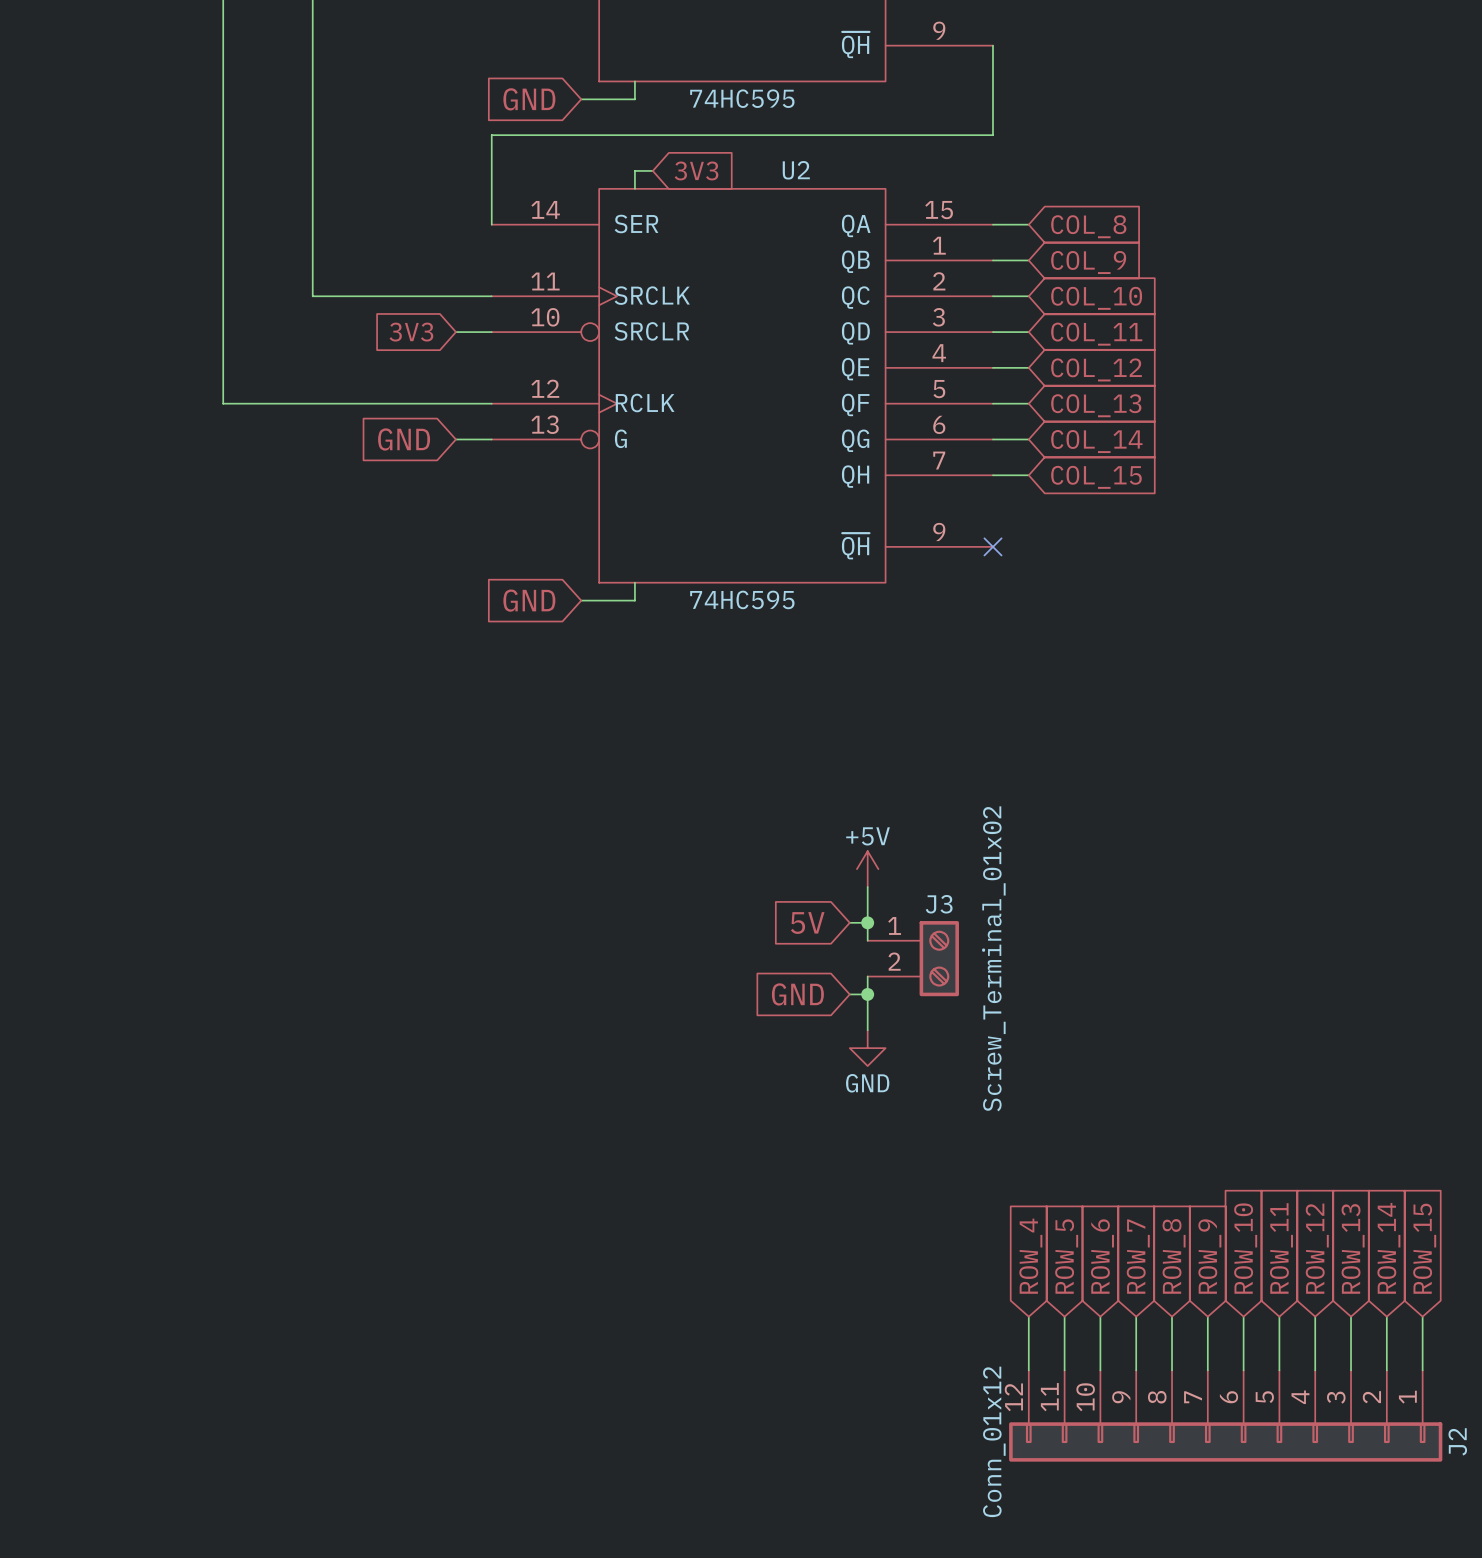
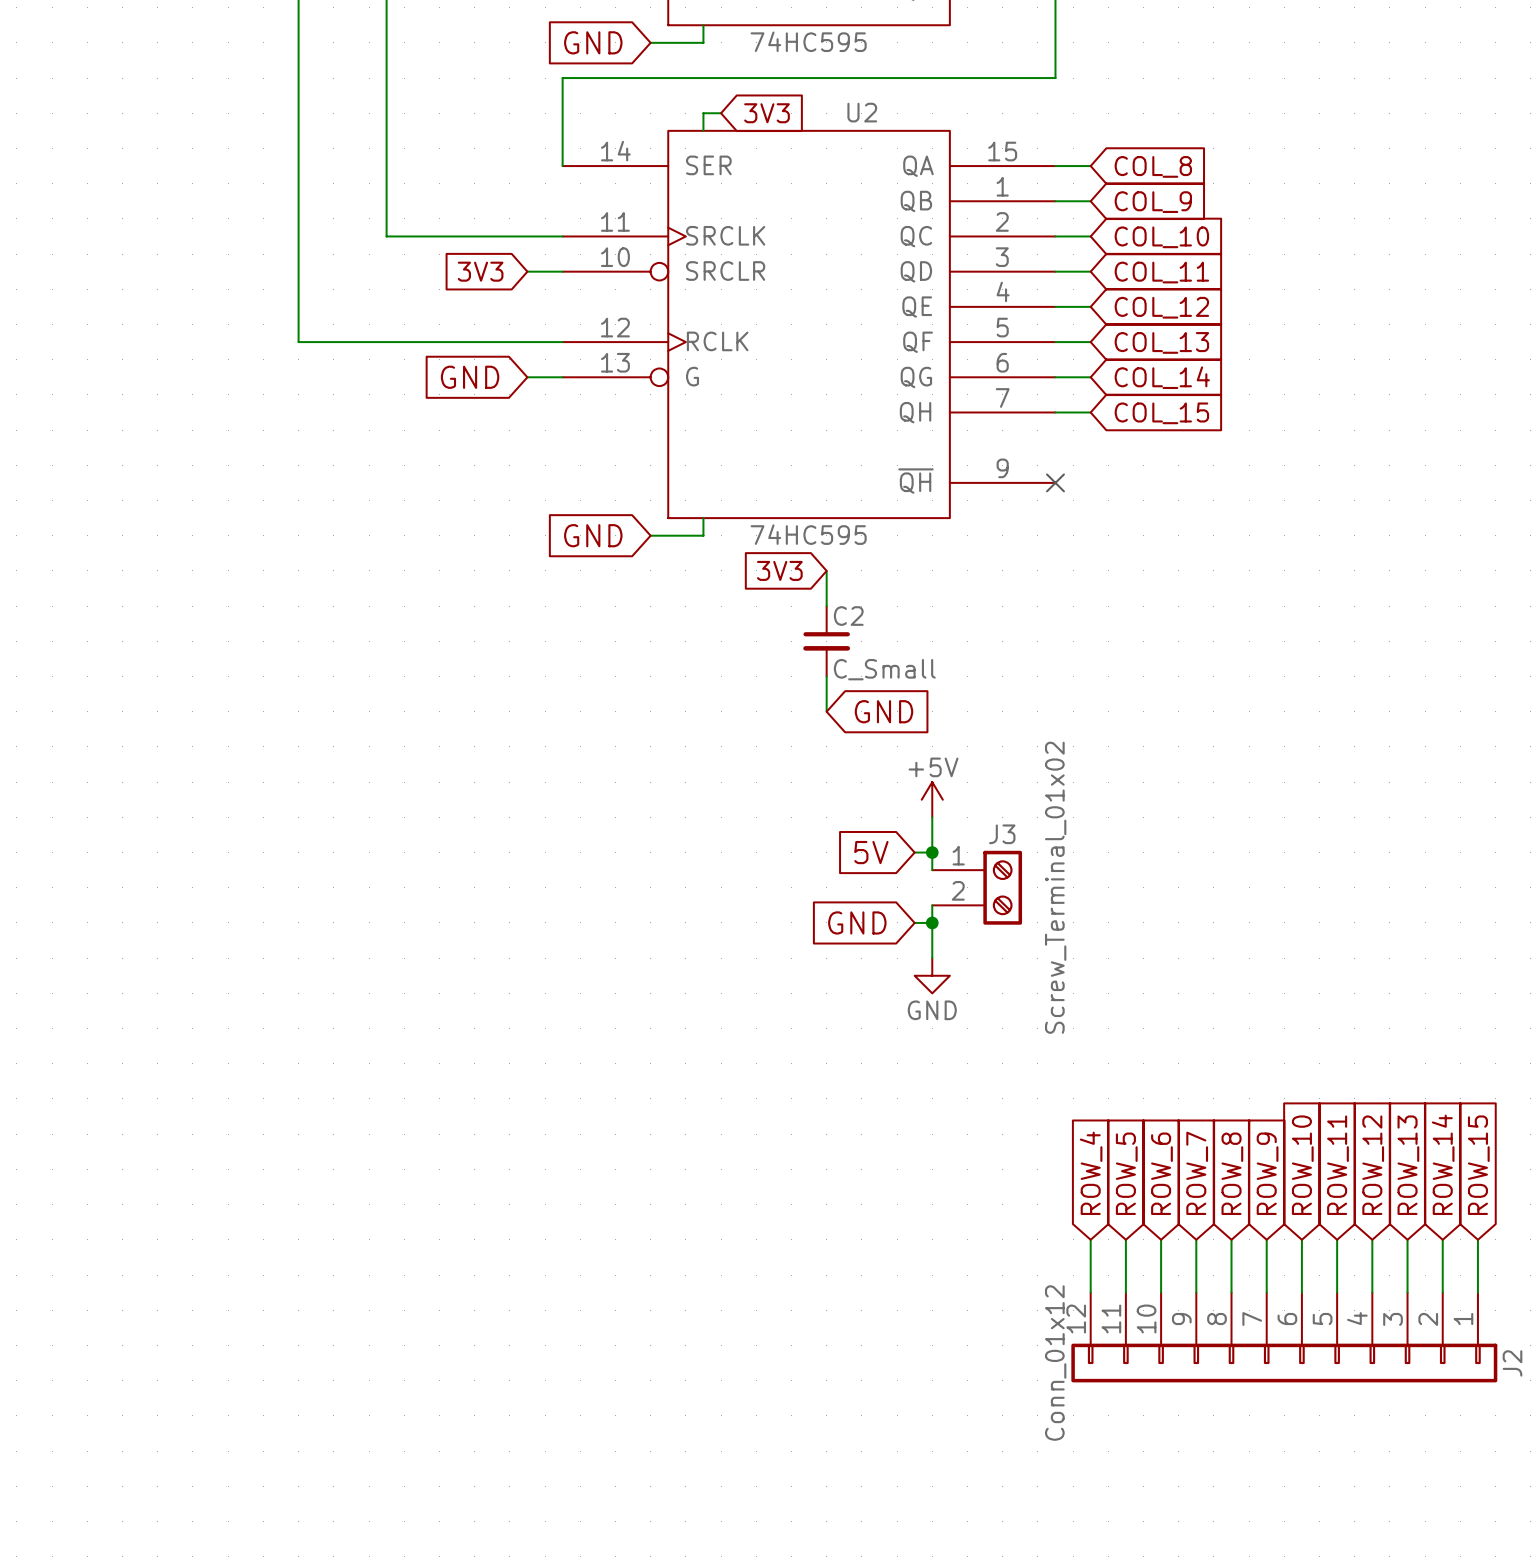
global label: none -> 3V3 (779, 570)
wire: none -> (826, 570) (826, 606)
C2: none -> C_Small (826, 641)
wire: none -> (826, 676) (826, 711)
global label: none -> GND (884, 711)

